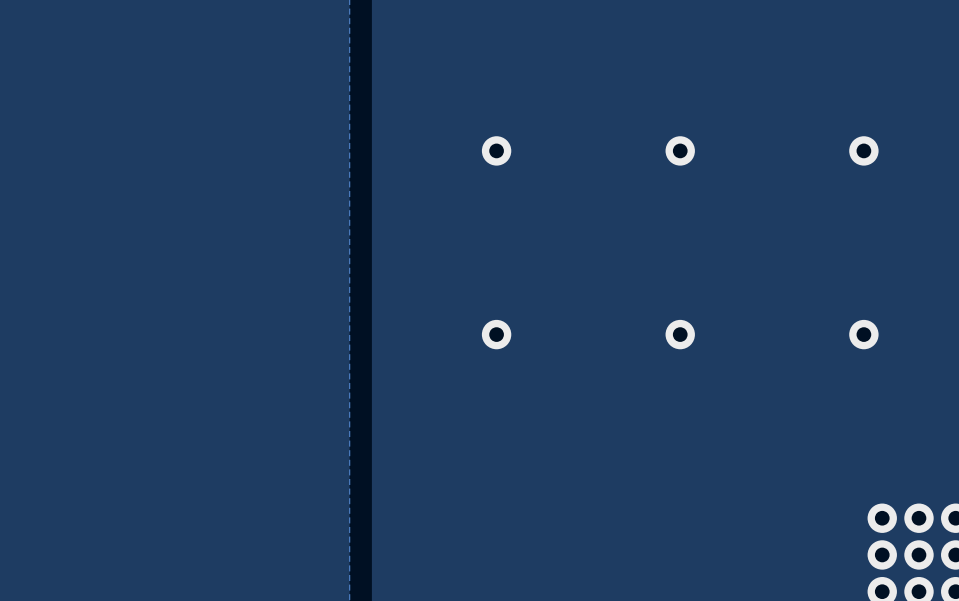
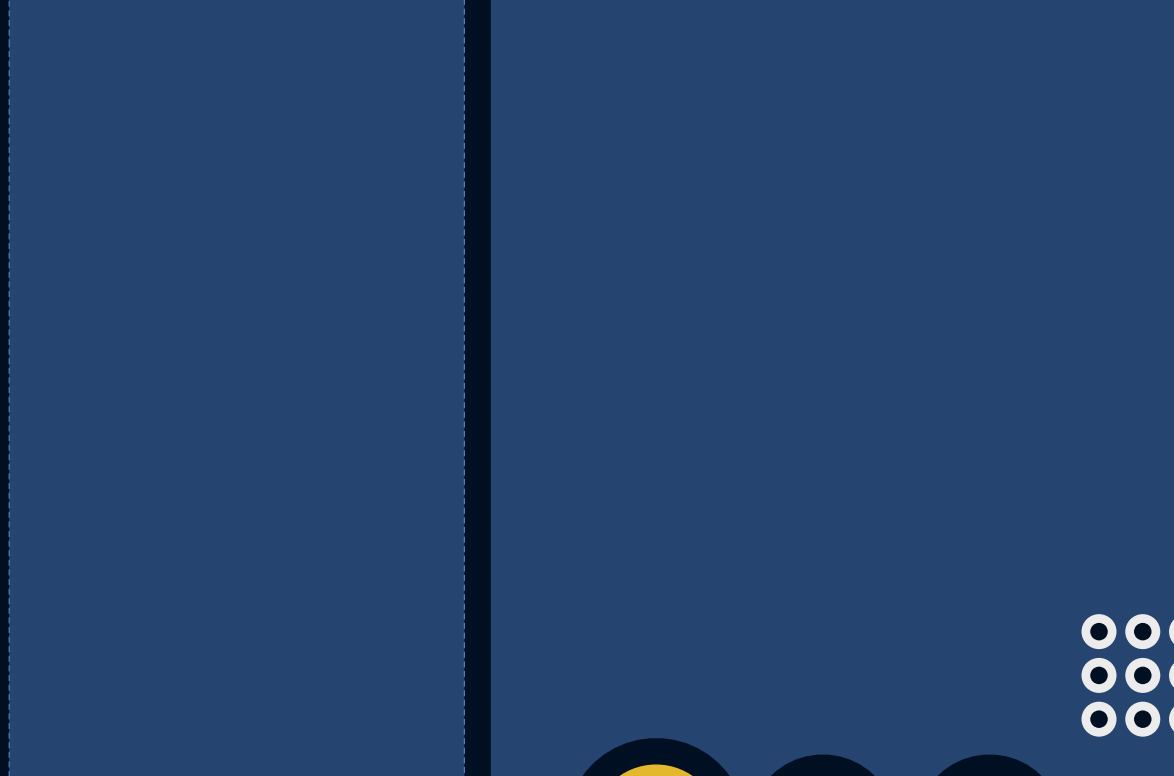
via: (496, 150) -> none
via: (680, 150) -> none
via: (863, 150) -> none
via: (496, 334) -> none
via: (680, 334) -> none
via: (863, 334) -> none

